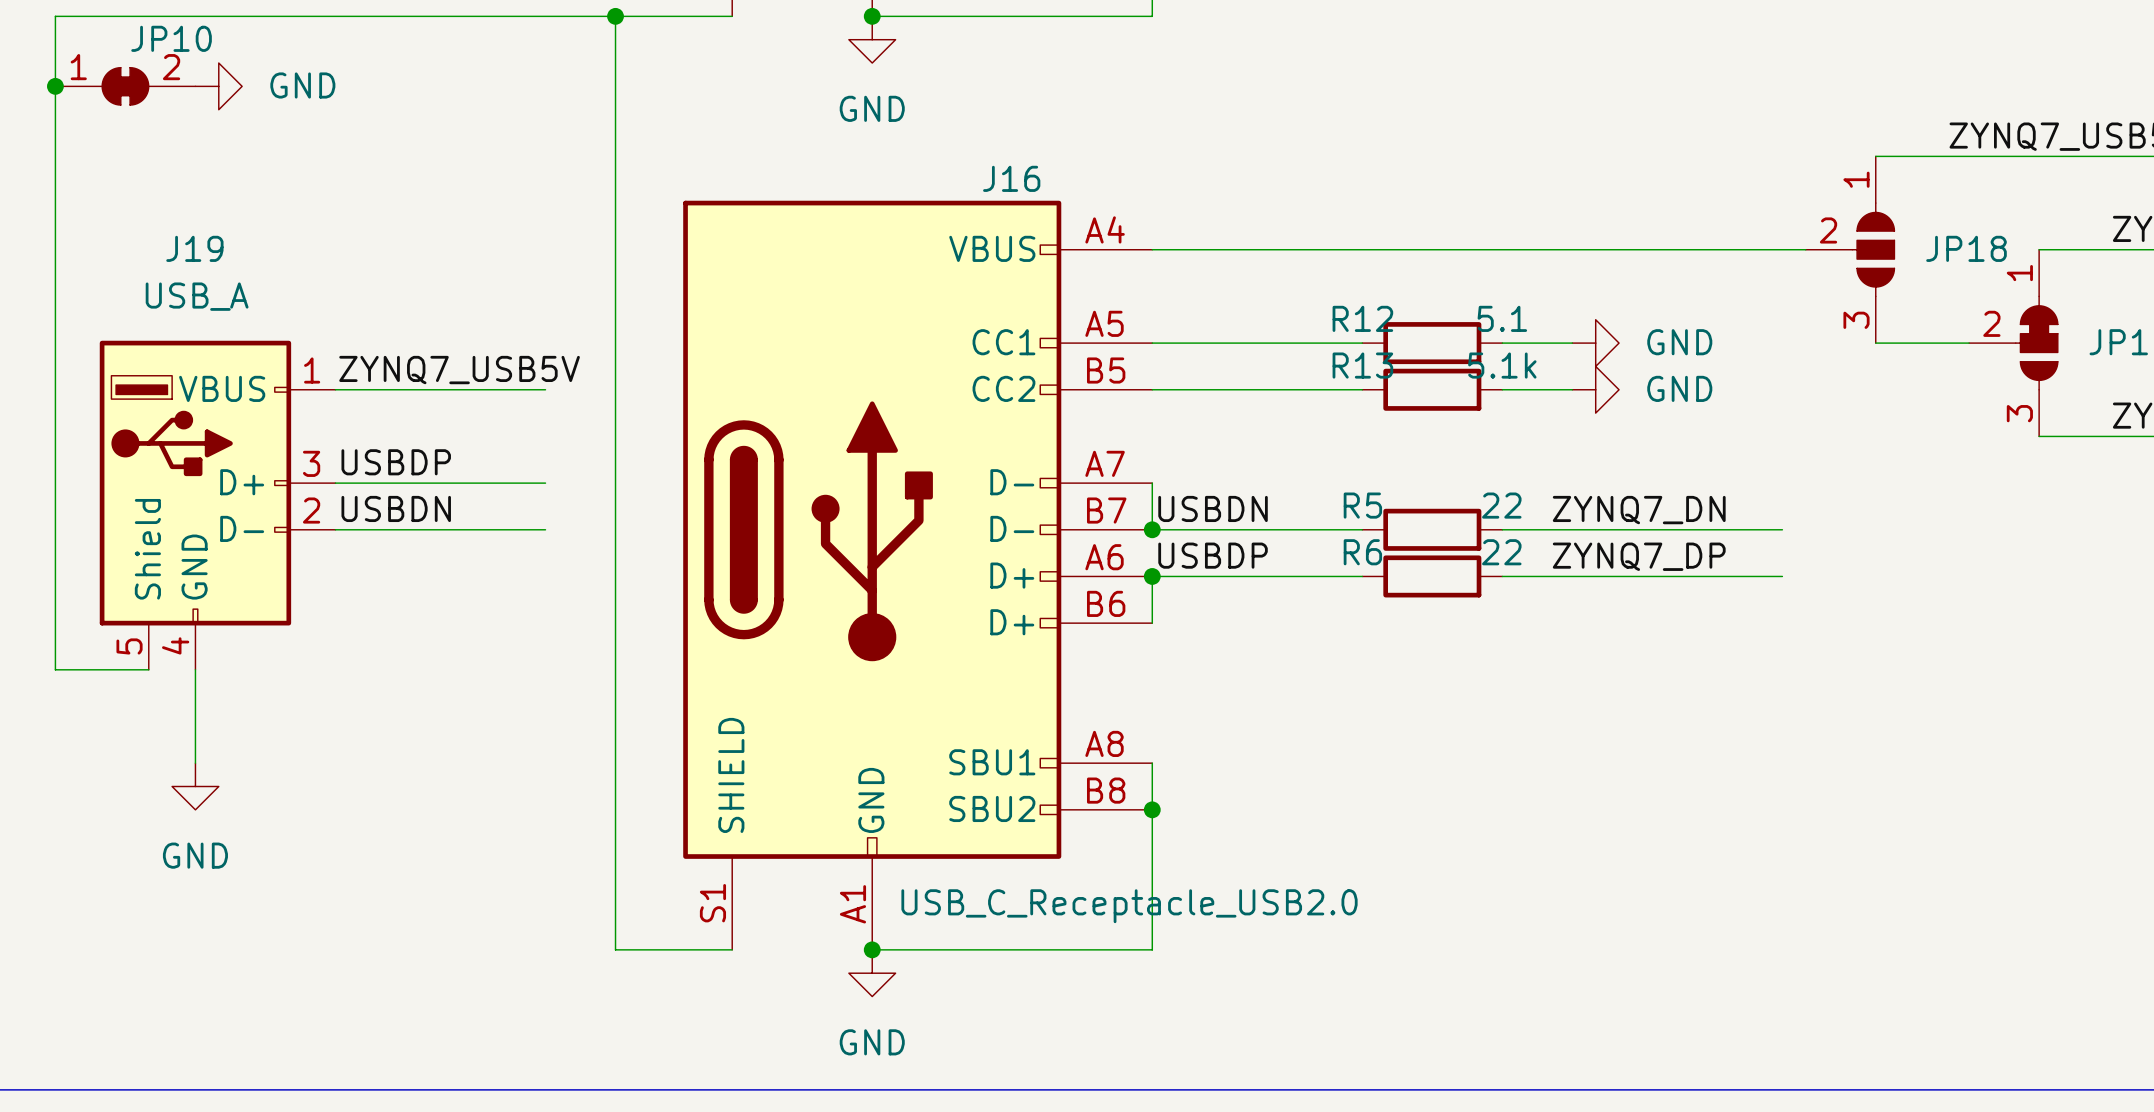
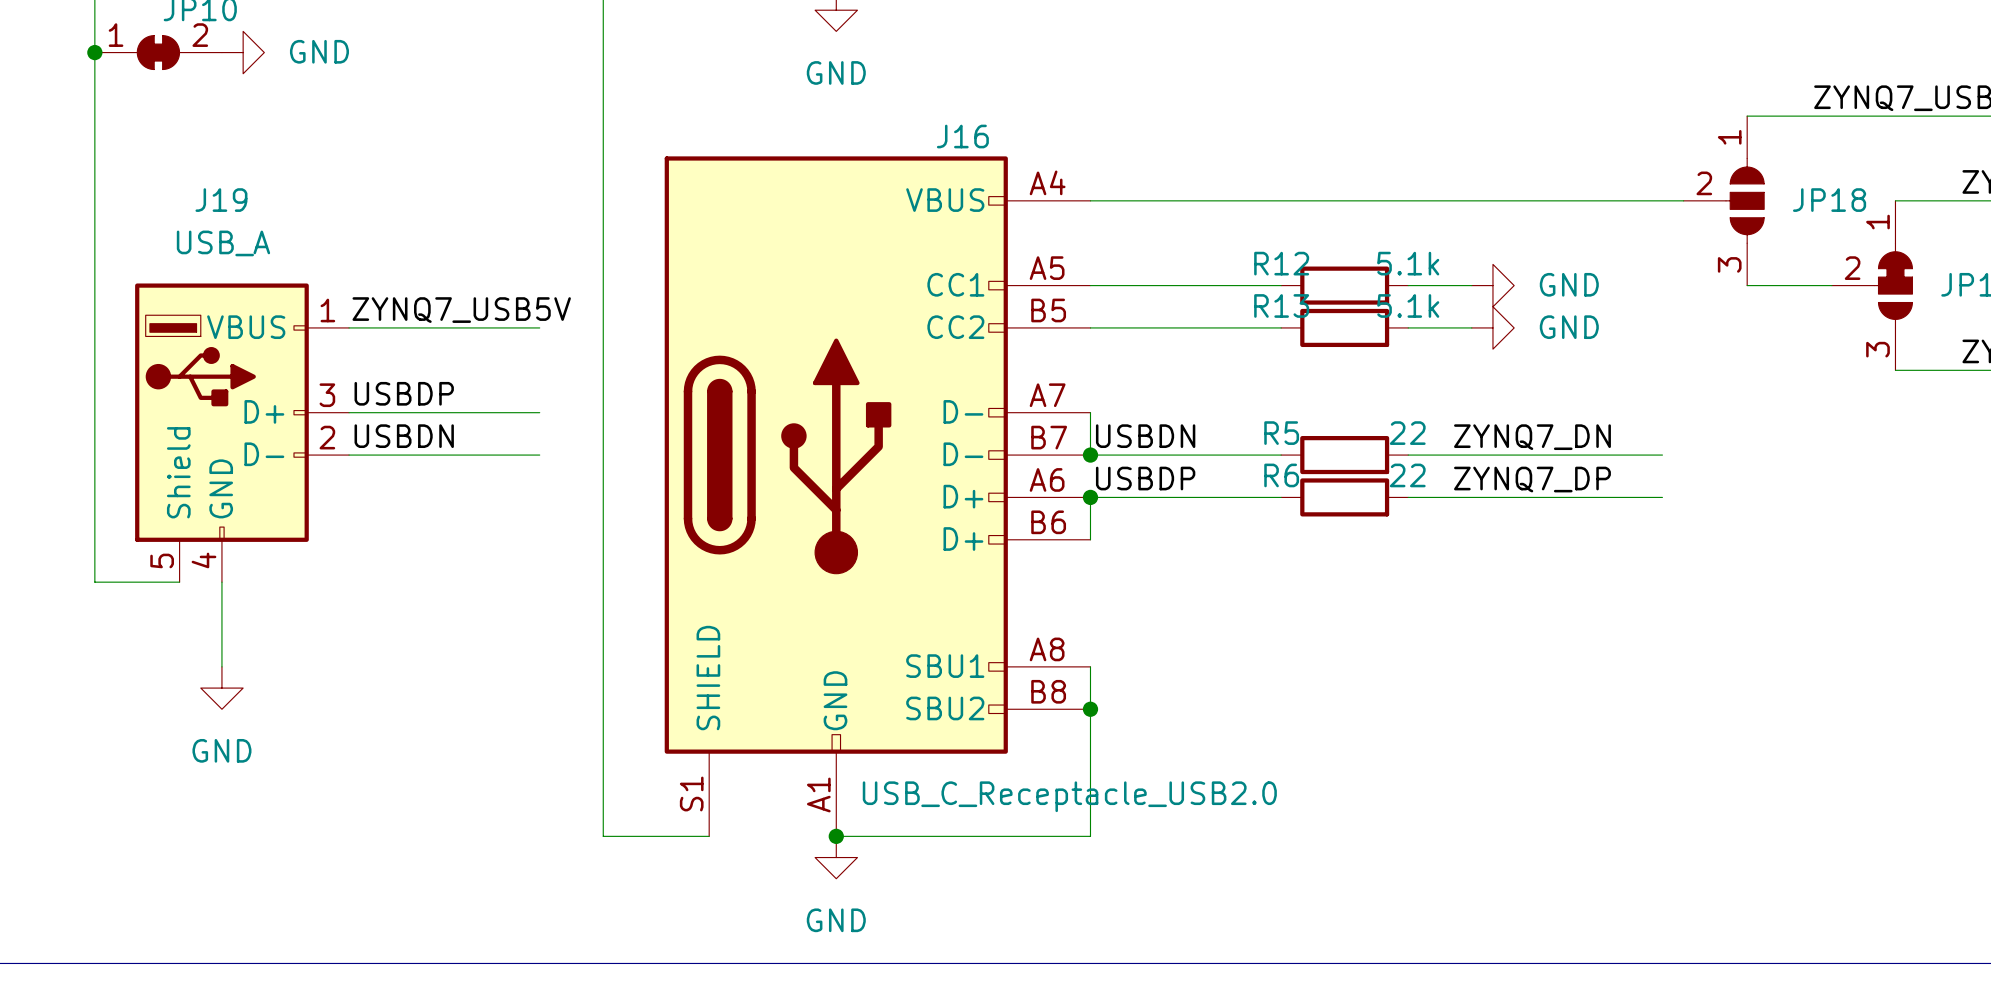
R12 value: 5.1 (1502, 318) -> 5.1k (1408, 263)

